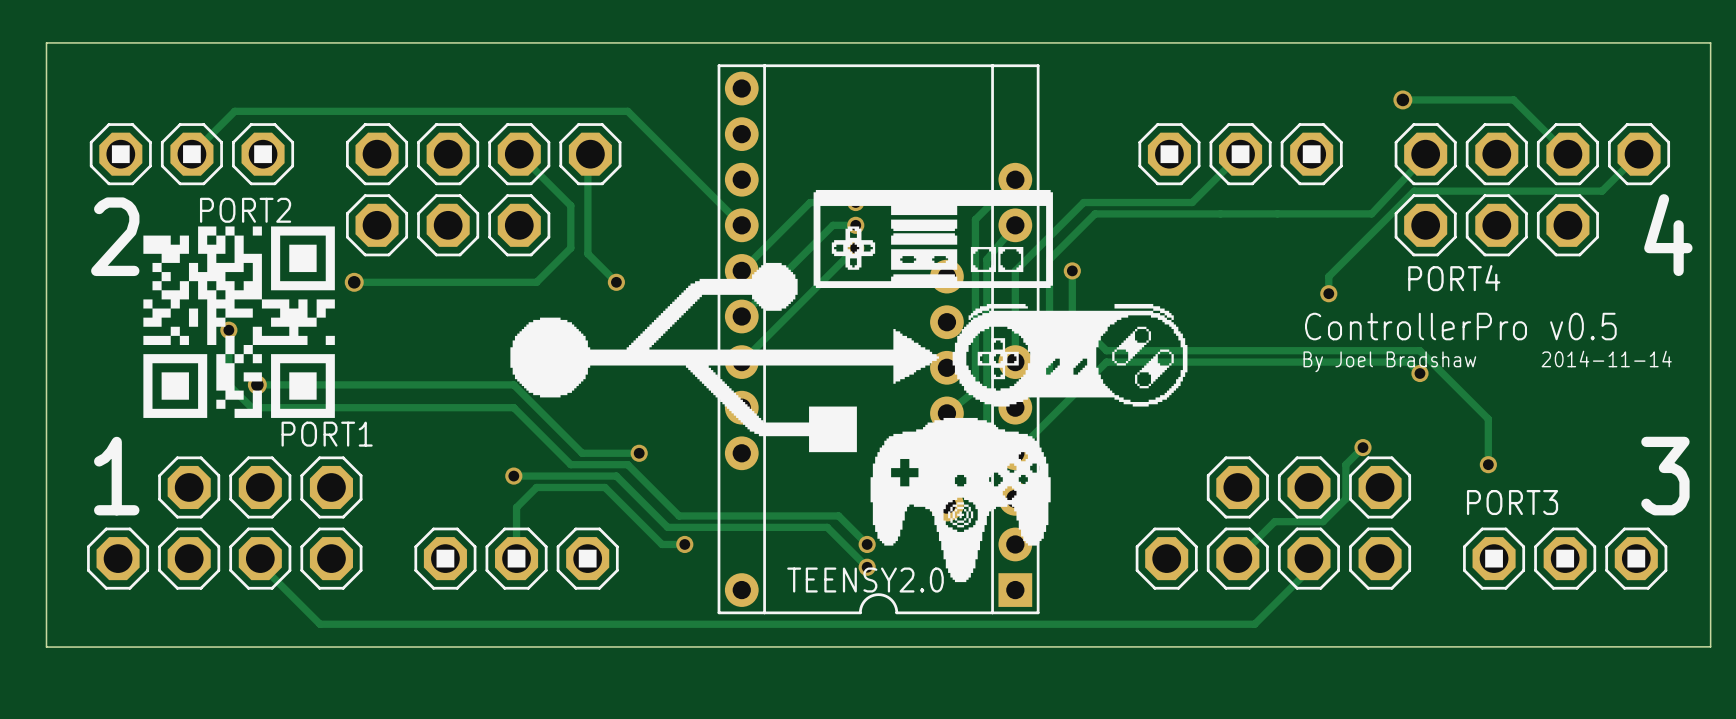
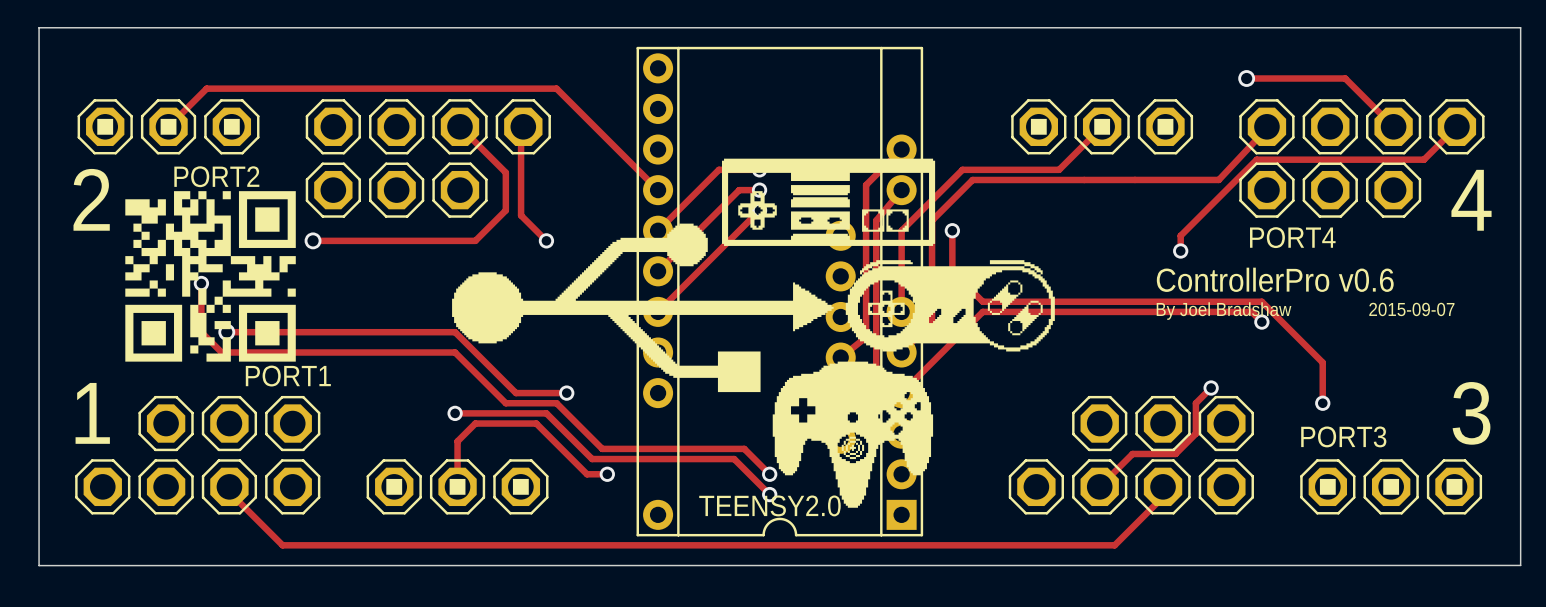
text: ControllerPro v0.5 (1460, 326) -> ControllerPro v0.6 (1275, 279)
text: 2014-11-14 (1606, 359) -> 2015-09-07 (1411, 309)

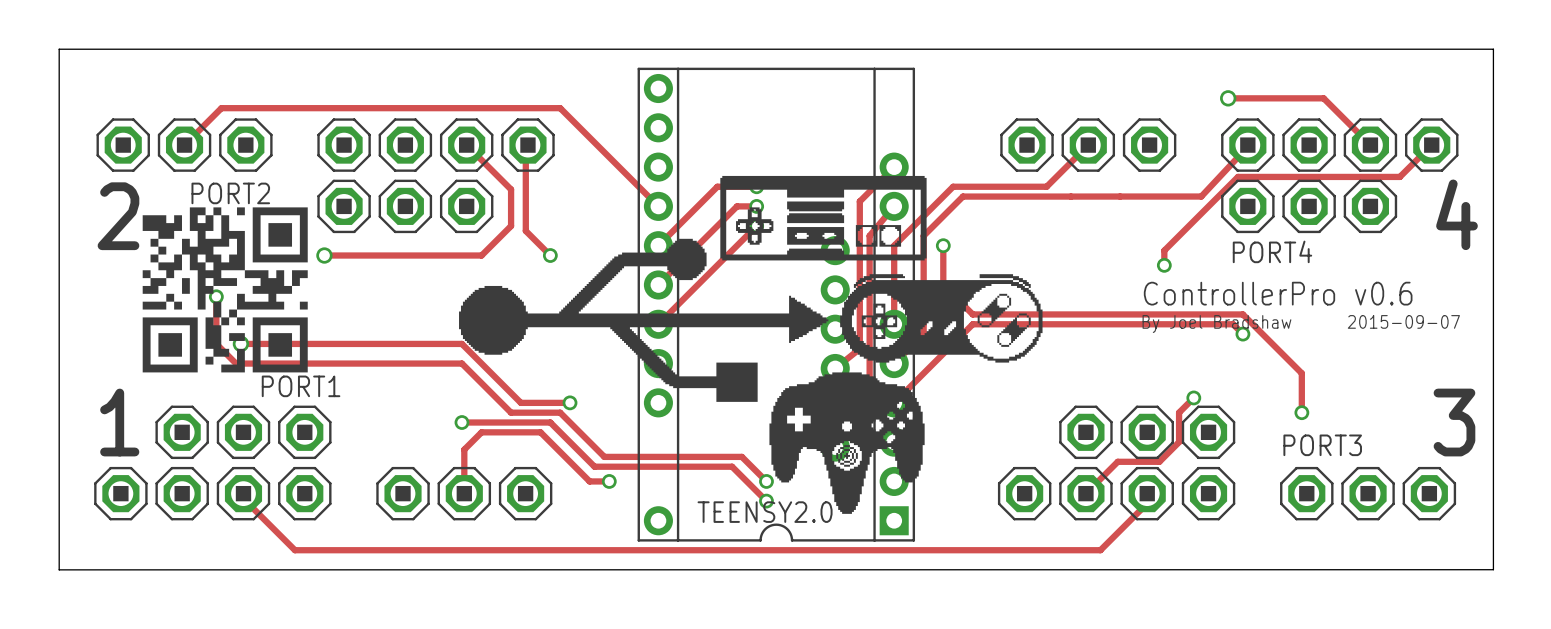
PORT2 footprint: [77, 99, 551, 218] -> [96, 118, 555, 234]
PORT4 footprint: [1011, 99, 1485, 218] -> [1000, 118, 1459, 234]
PORT1 footprint: [75, 395, 549, 515] -> [94, 405, 553, 521]
PORT3 footprint: [1008, 395, 1483, 515] -> [997, 405, 1457, 521]

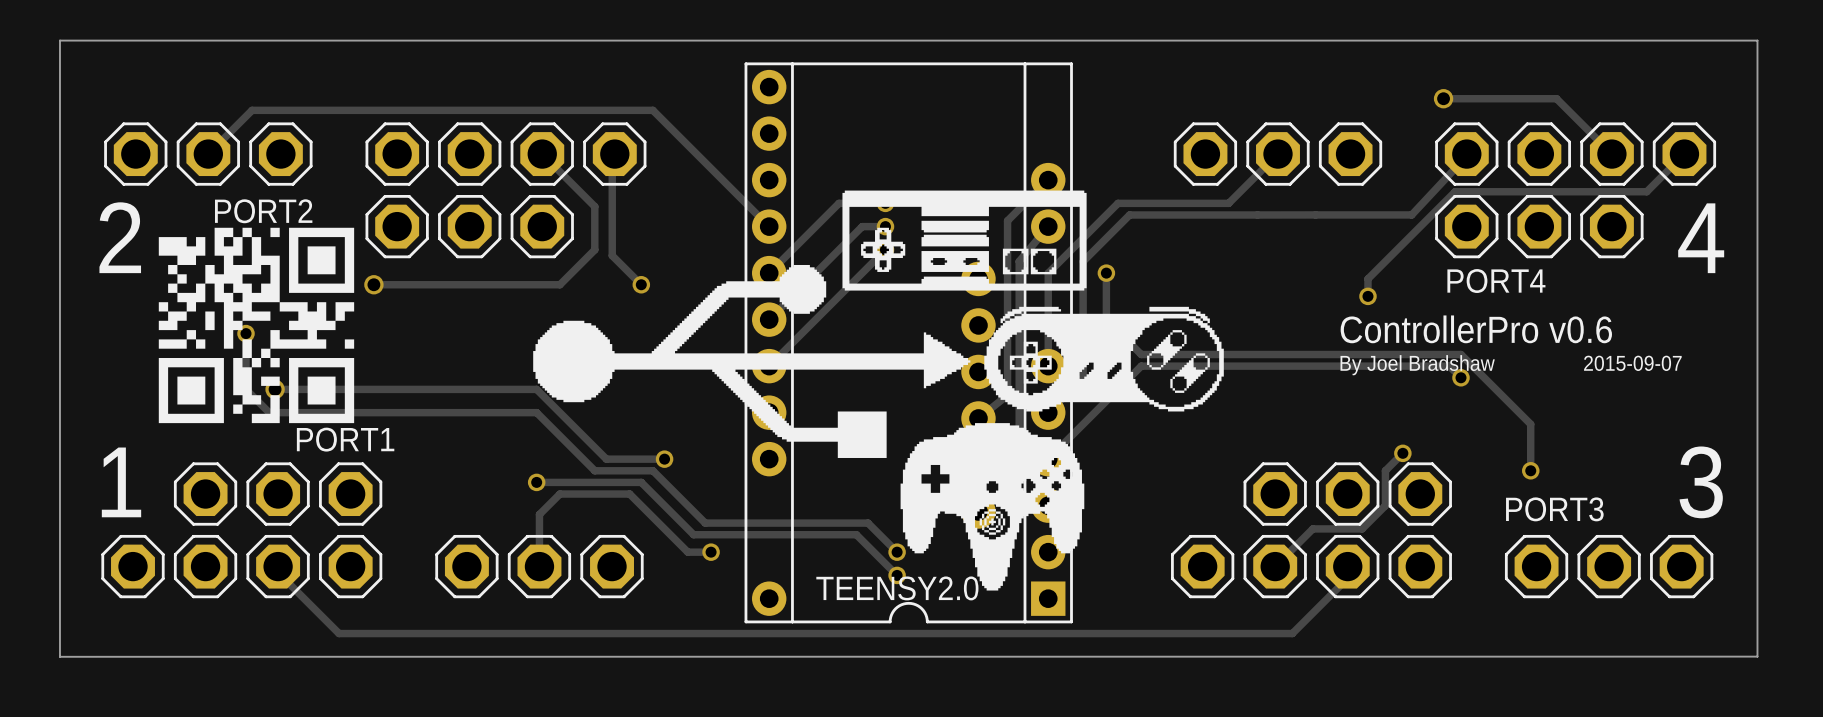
PORT2 footprint: [96, 118, 555, 234] -> [104, 122, 647, 259]
PORT4 footprint: [1000, 118, 1459, 234] -> [1173, 122, 1717, 259]
PORT1 footprint: [94, 405, 553, 521] -> [101, 462, 644, 599]
PORT3 footprint: [997, 405, 1457, 521] -> [1171, 462, 1714, 599]

